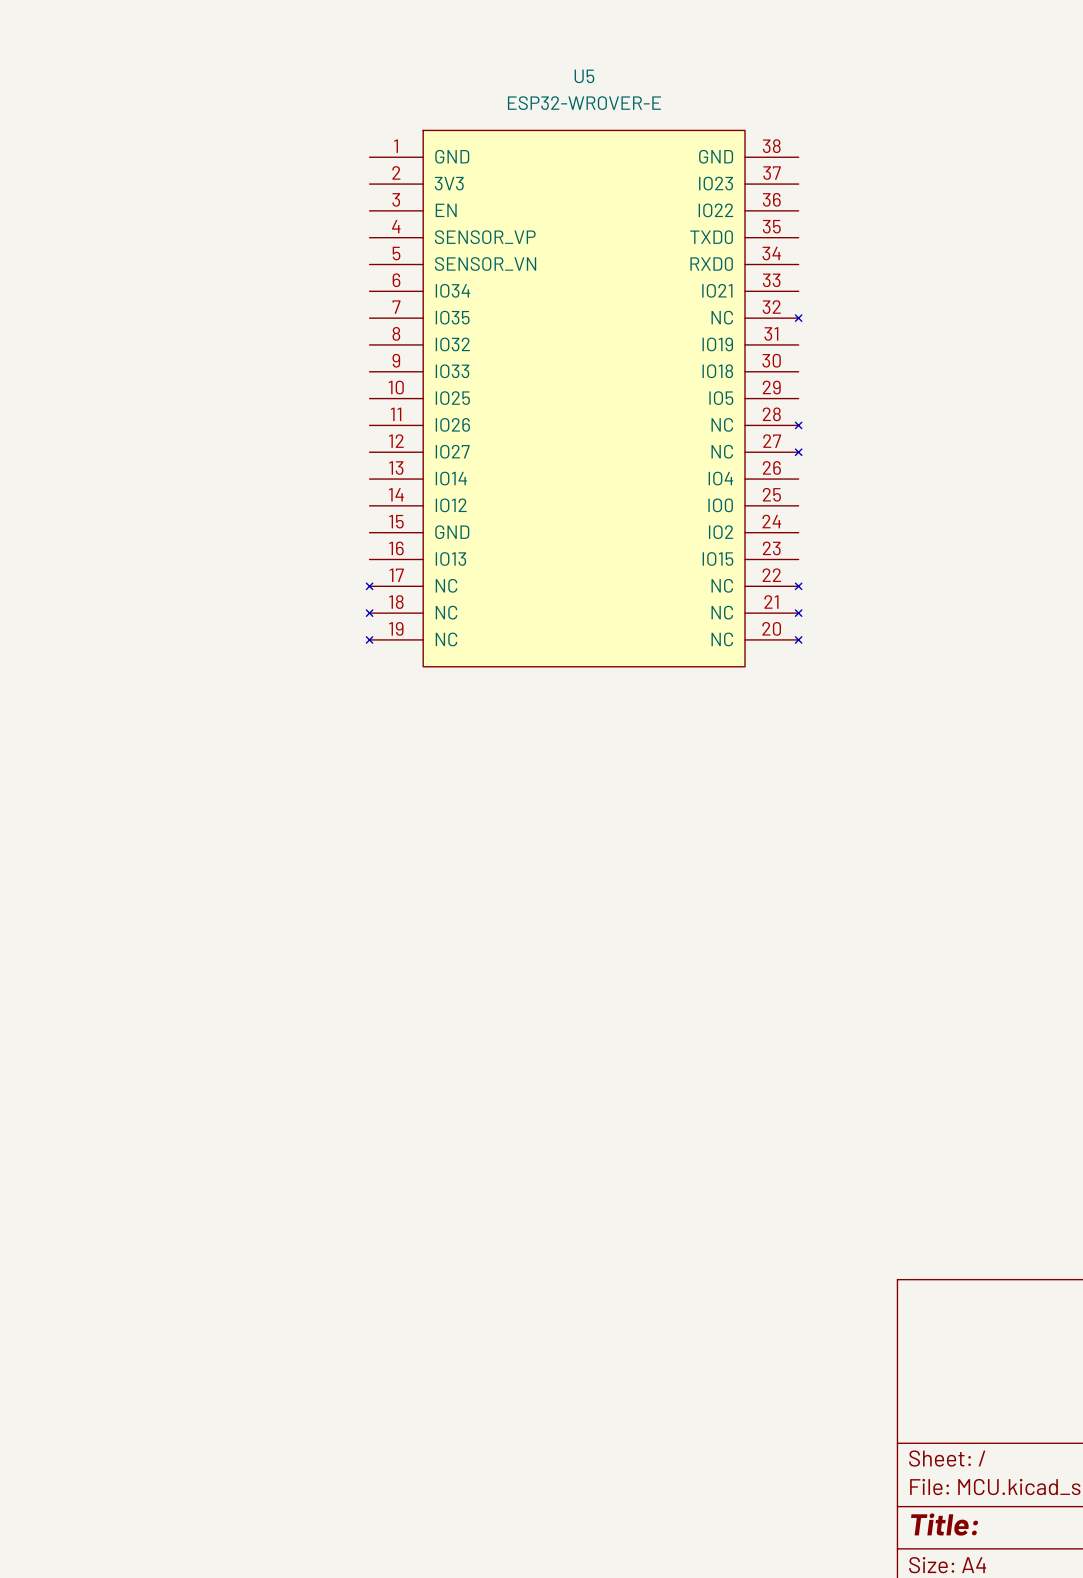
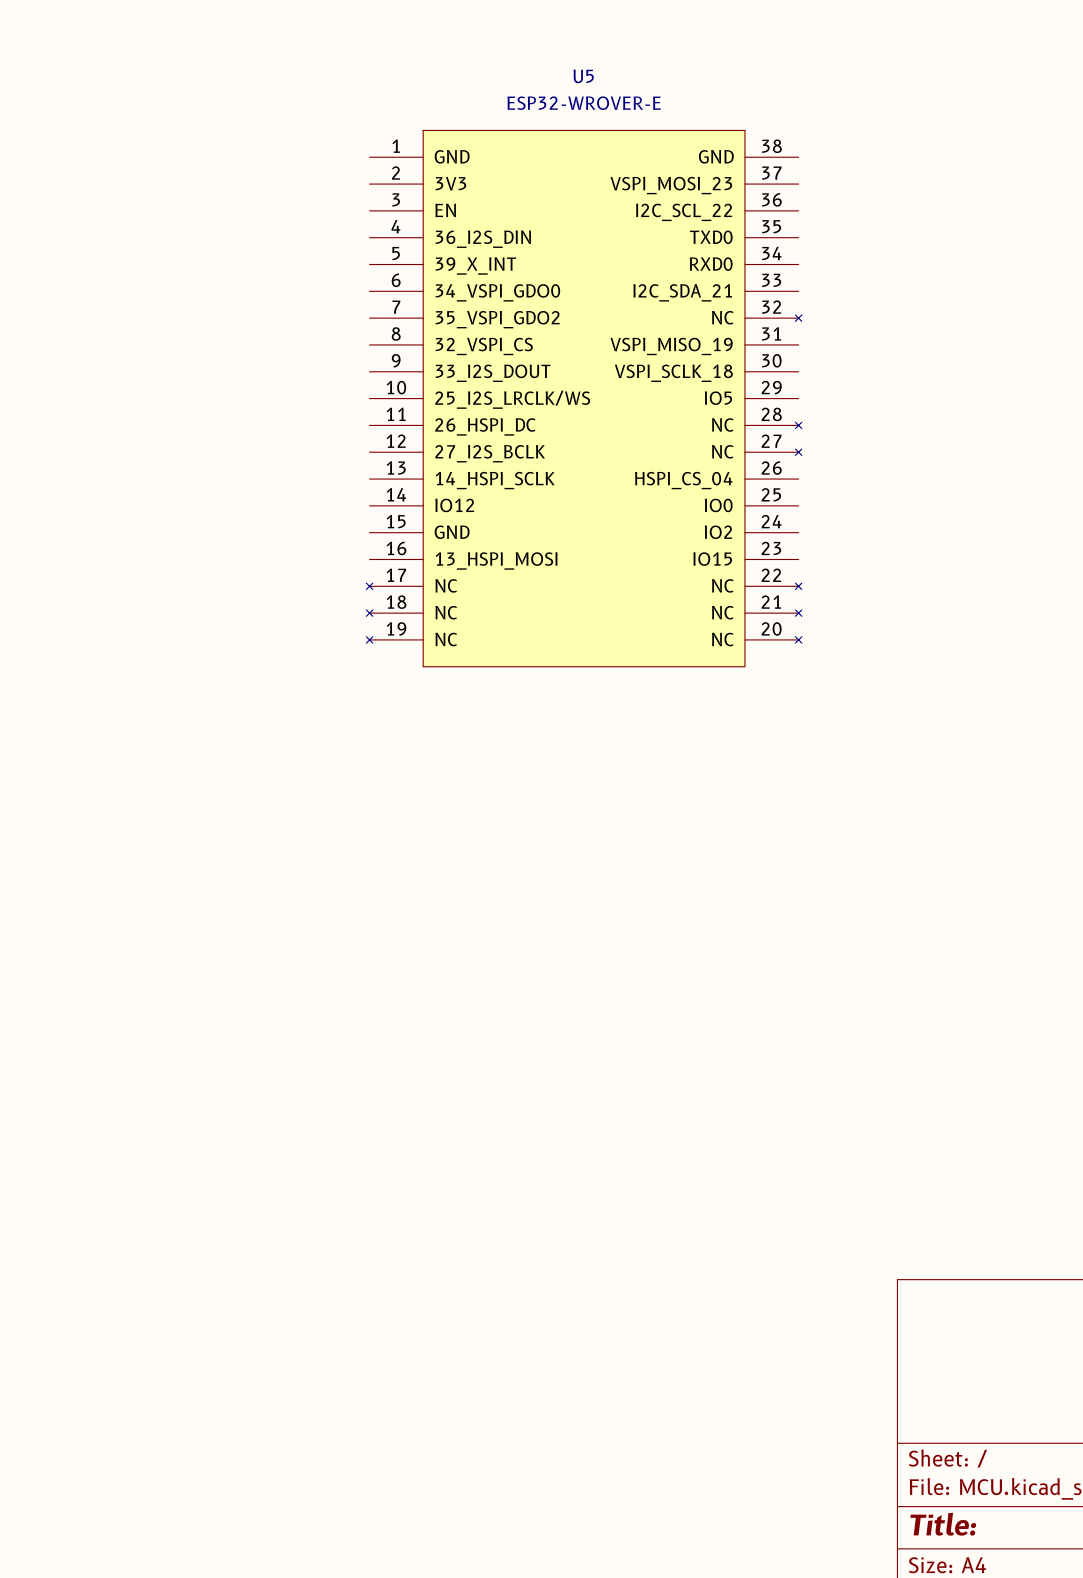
U5 symbol: [366, 130, 802, 667] -> [366, 130, 802, 667]

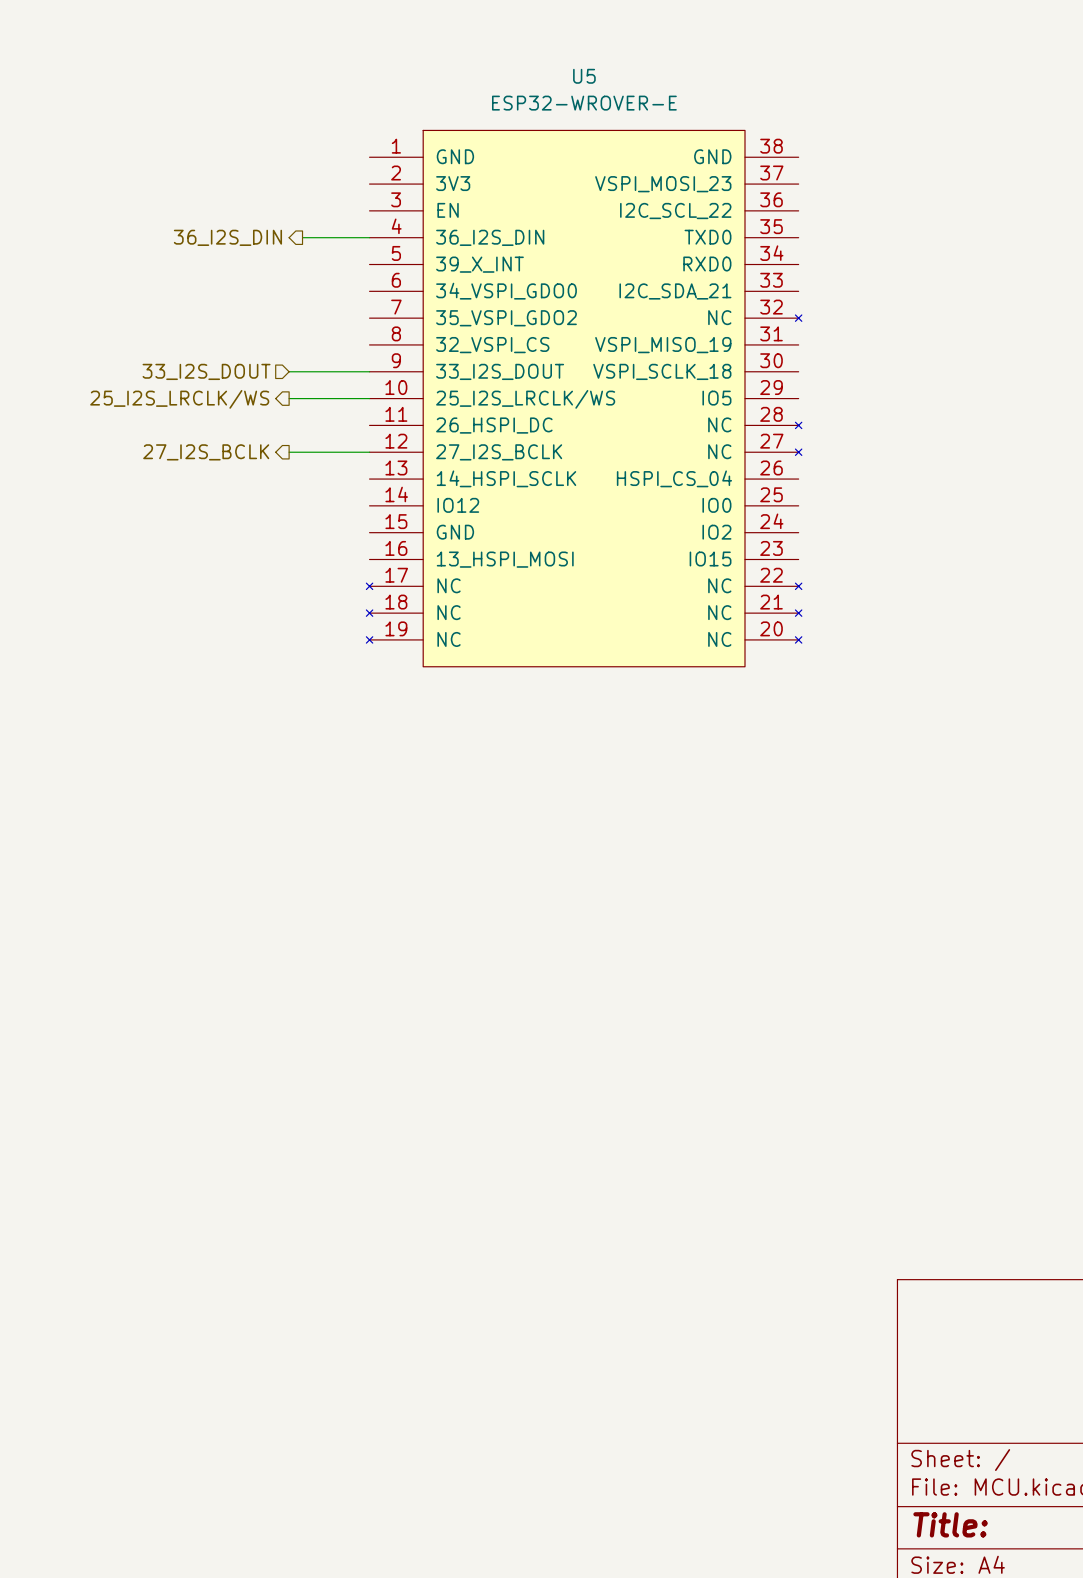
wire: none -> (302, 237) (369, 237)
hierarchical label: none -> 36_I2S_DIN (227, 237)
wire: none -> (289, 371) (369, 371)
hierarchical label: none -> 33_I2S_DOUT (206, 371)
wire: none -> (289, 398) (369, 398)
hierarchical label: none -> 25_I2S_LRCLK/WS (179, 399)
wire: none -> (289, 452) (369, 452)
hierarchical label: none -> 27_I2S_BCLK (206, 452)

